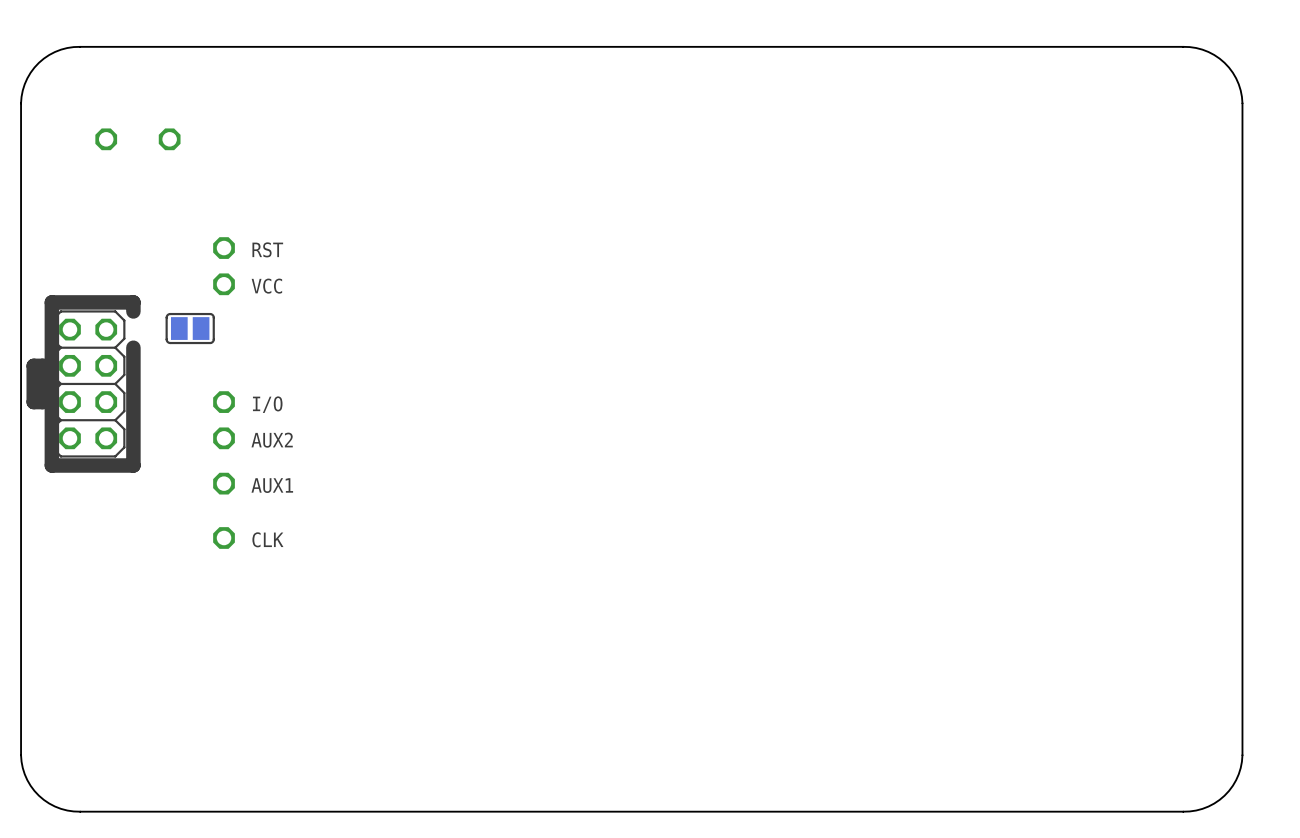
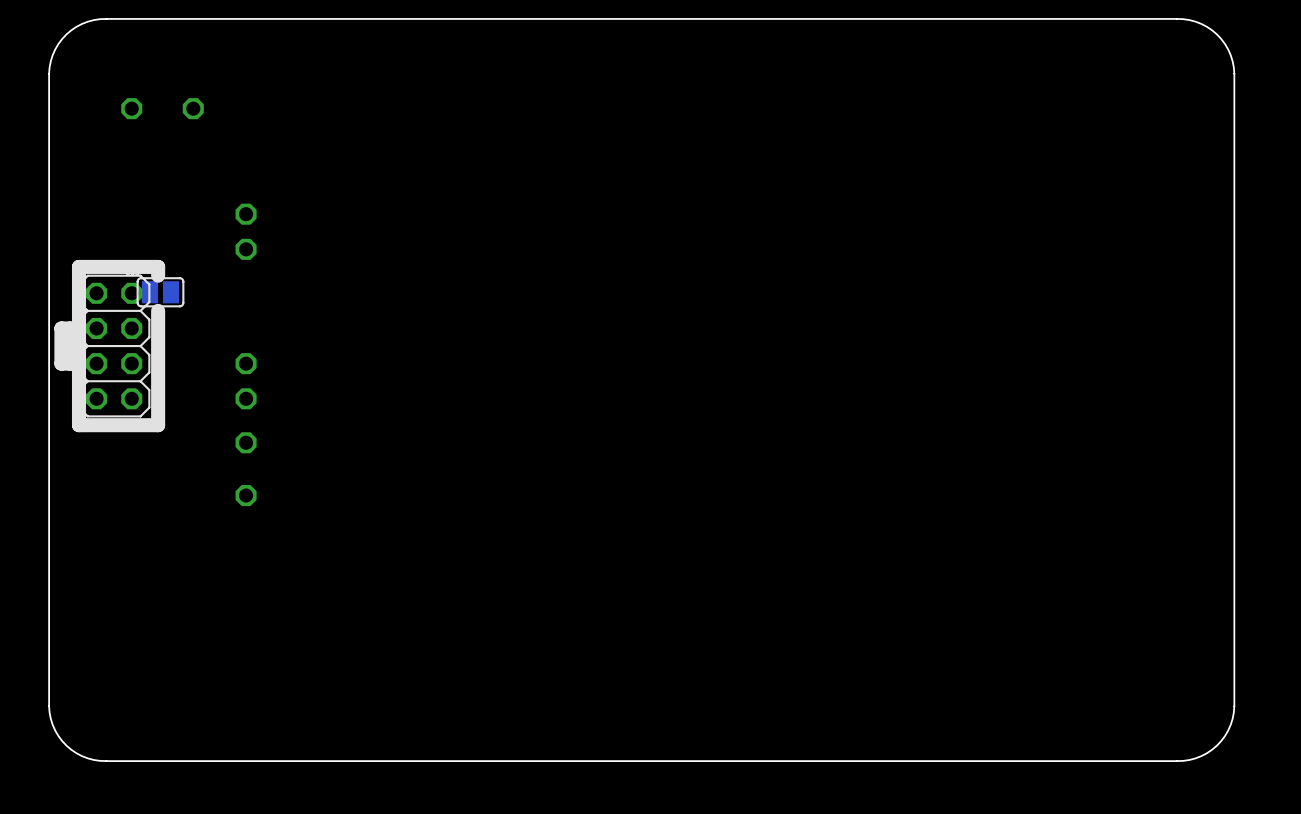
text: RST (267, 249) -> none
text: VCC (266, 286) -> none
part: none -> (160, 292)
part: (190, 328) -> none
text: I/O (267, 404) -> none
text: AUX2 (272, 440) -> none
text: AUX1 (272, 485) -> none
text: CLK (267, 539) -> none

